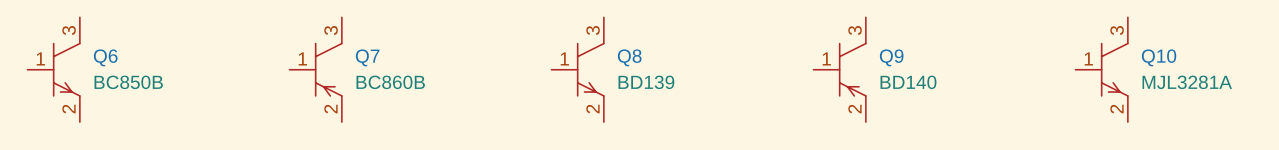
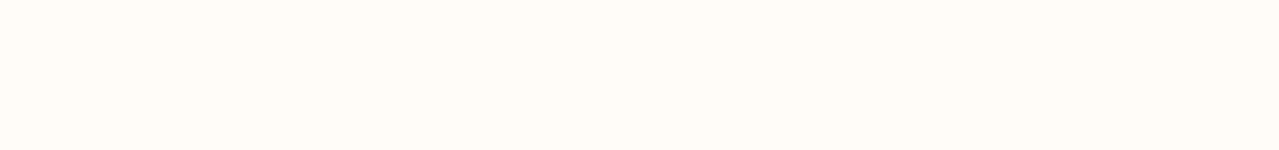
Q6: BC850B (53, 69) -> none
Q7: BC860B (315, 69) -> none
Q8: BD139 (577, 69) -> none
Q9: BD140 (839, 69) -> none
Q10: MJL3281A (1101, 69) -> none

